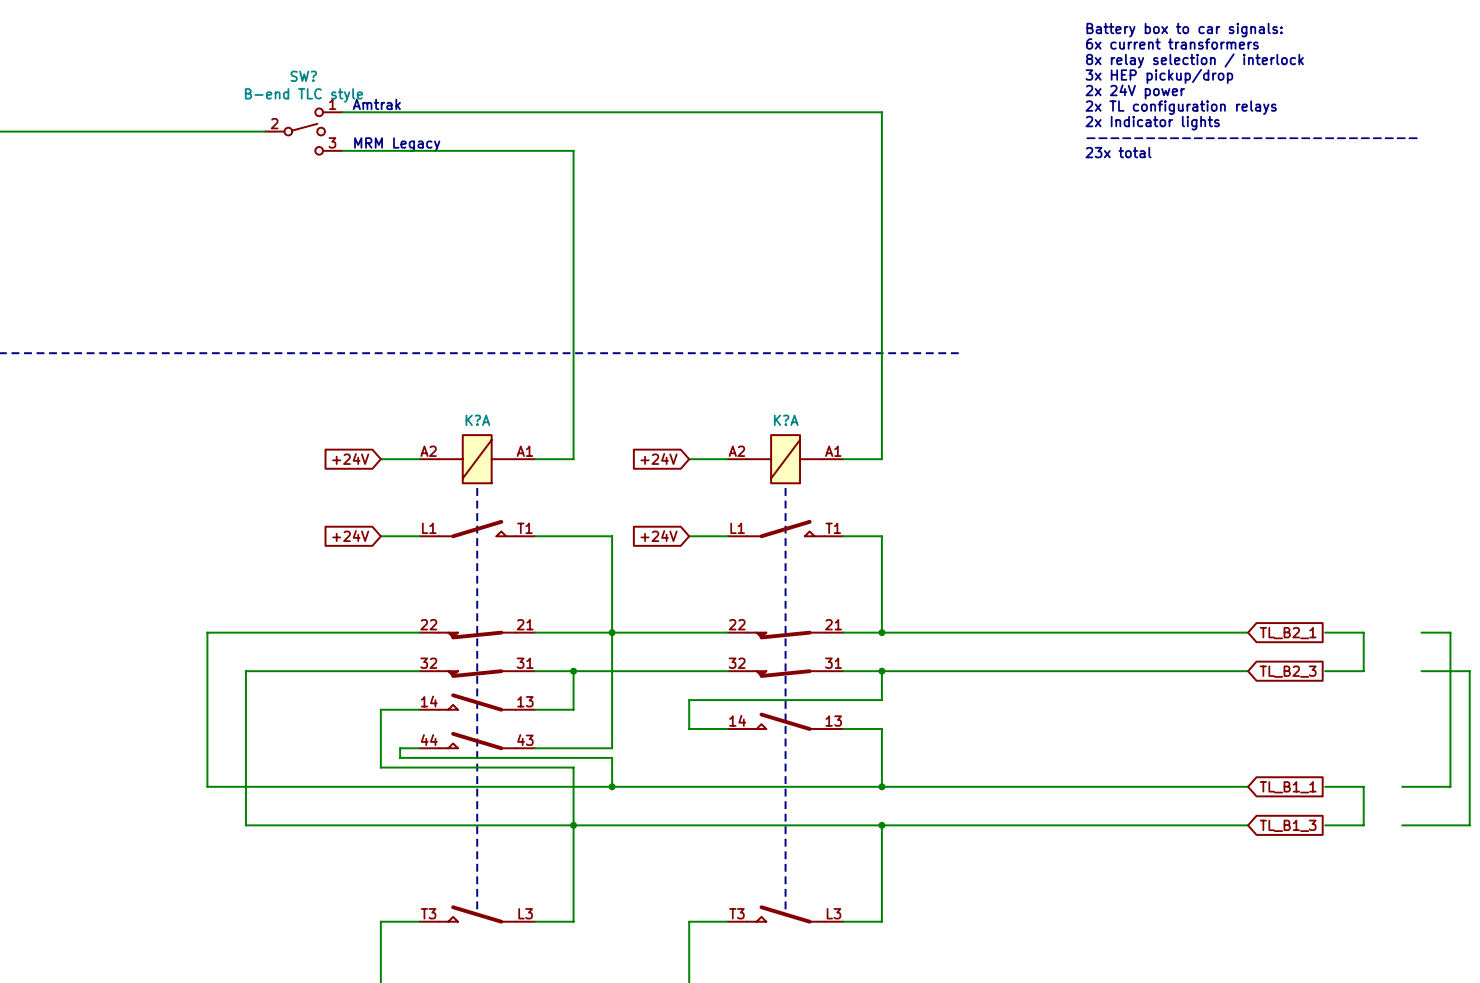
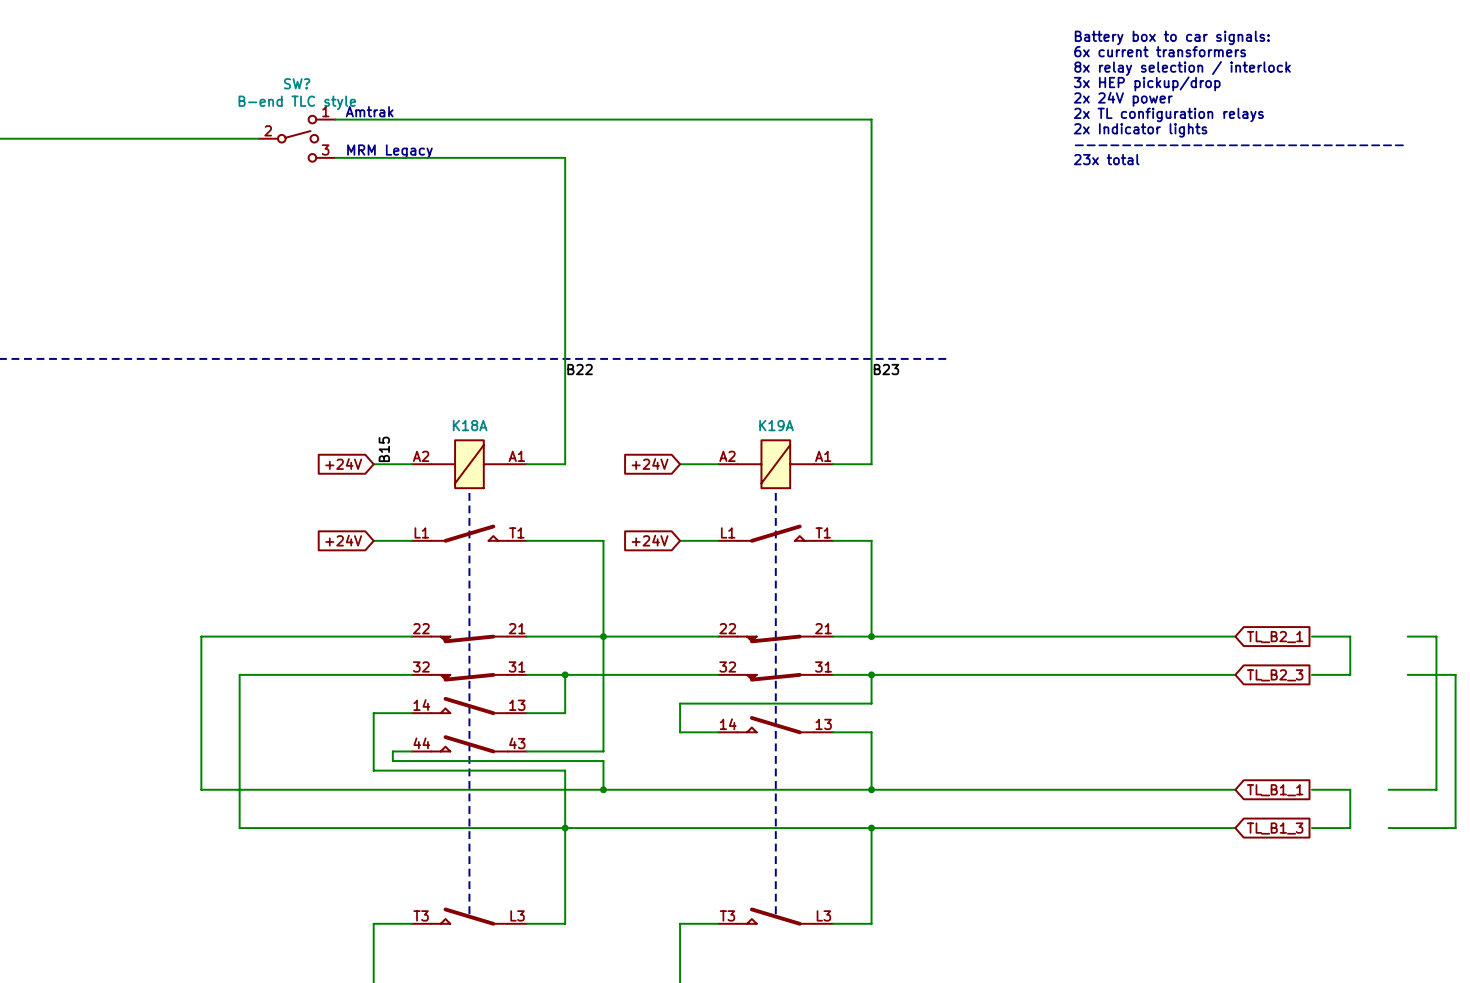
label: none -> B22 (580, 369)
label: none -> B23 (886, 369)
K?A name: K?A (477, 420) -> K18A (470, 425)
K?A name: K?A (786, 420) -> K19A (776, 425)
label: none -> B15 (384, 449)

